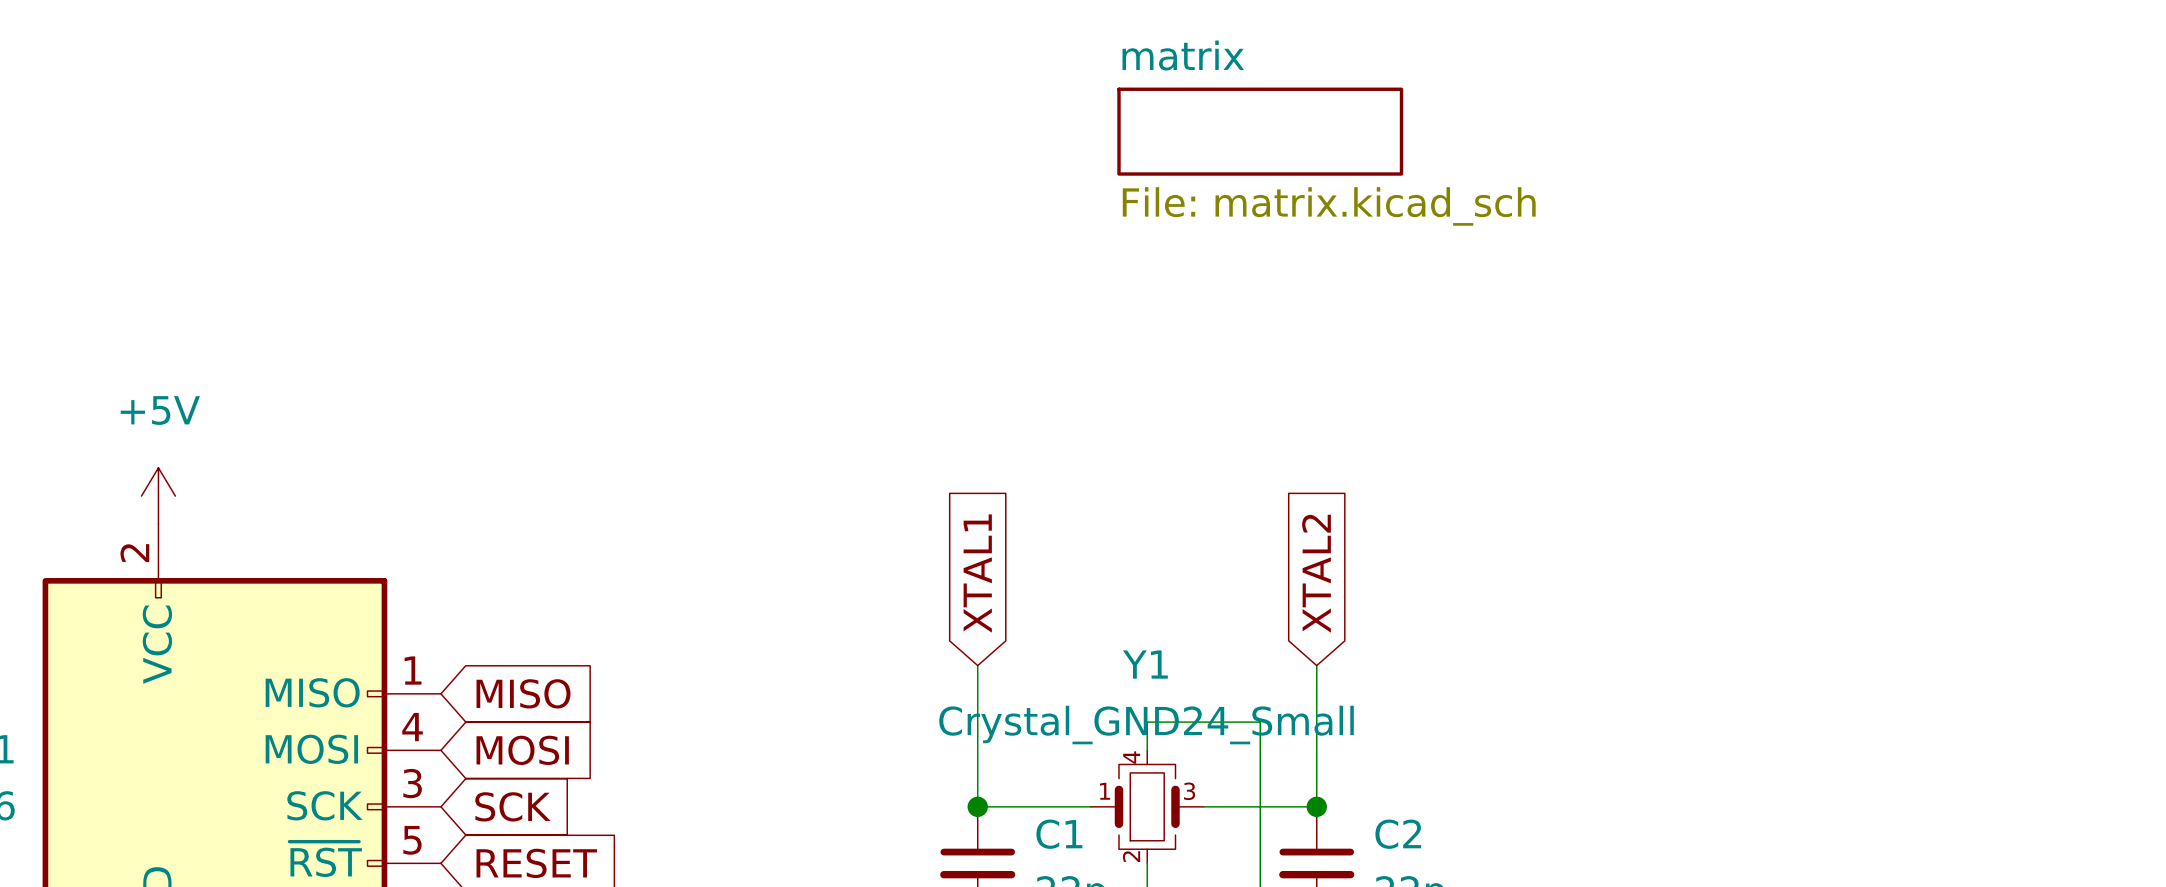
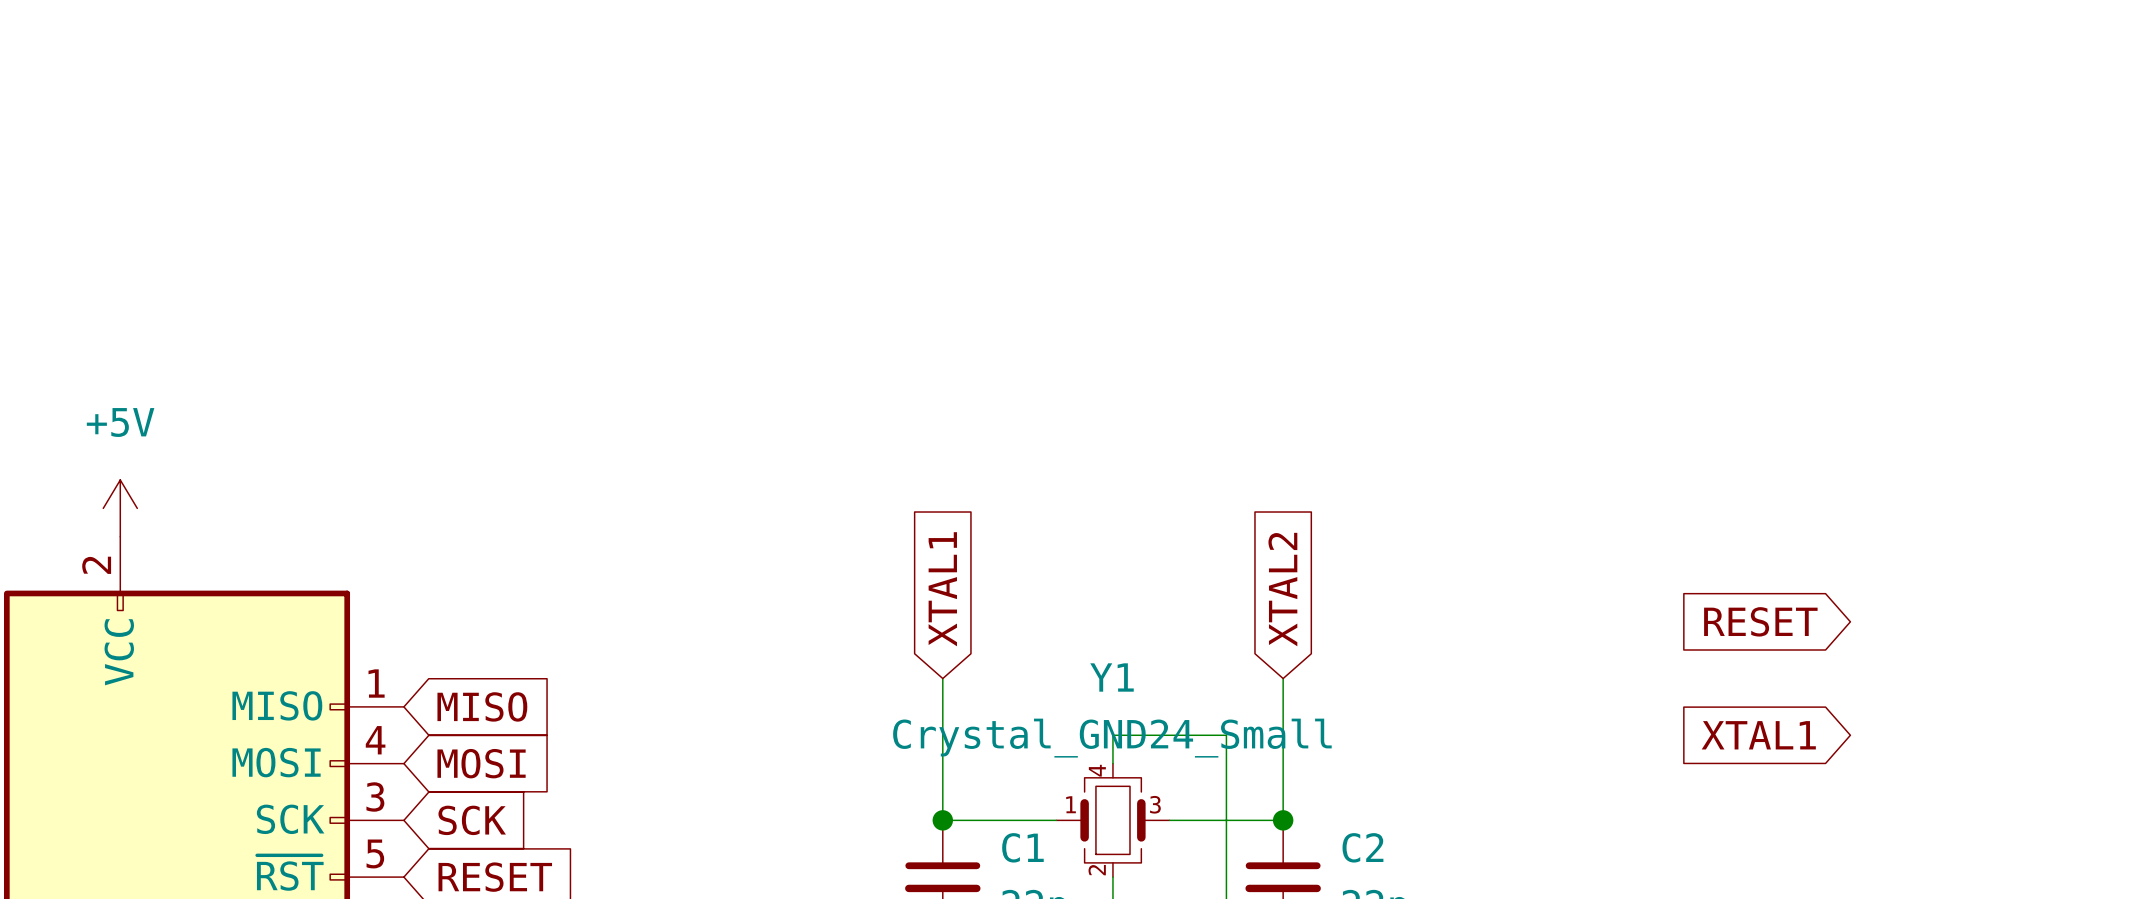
sheet matrix: File: matrix.kicad_sch (1260, 131) -> none
global label: none -> RESET (1760, 621)
global label: none -> XTAL1 (1758, 735)

